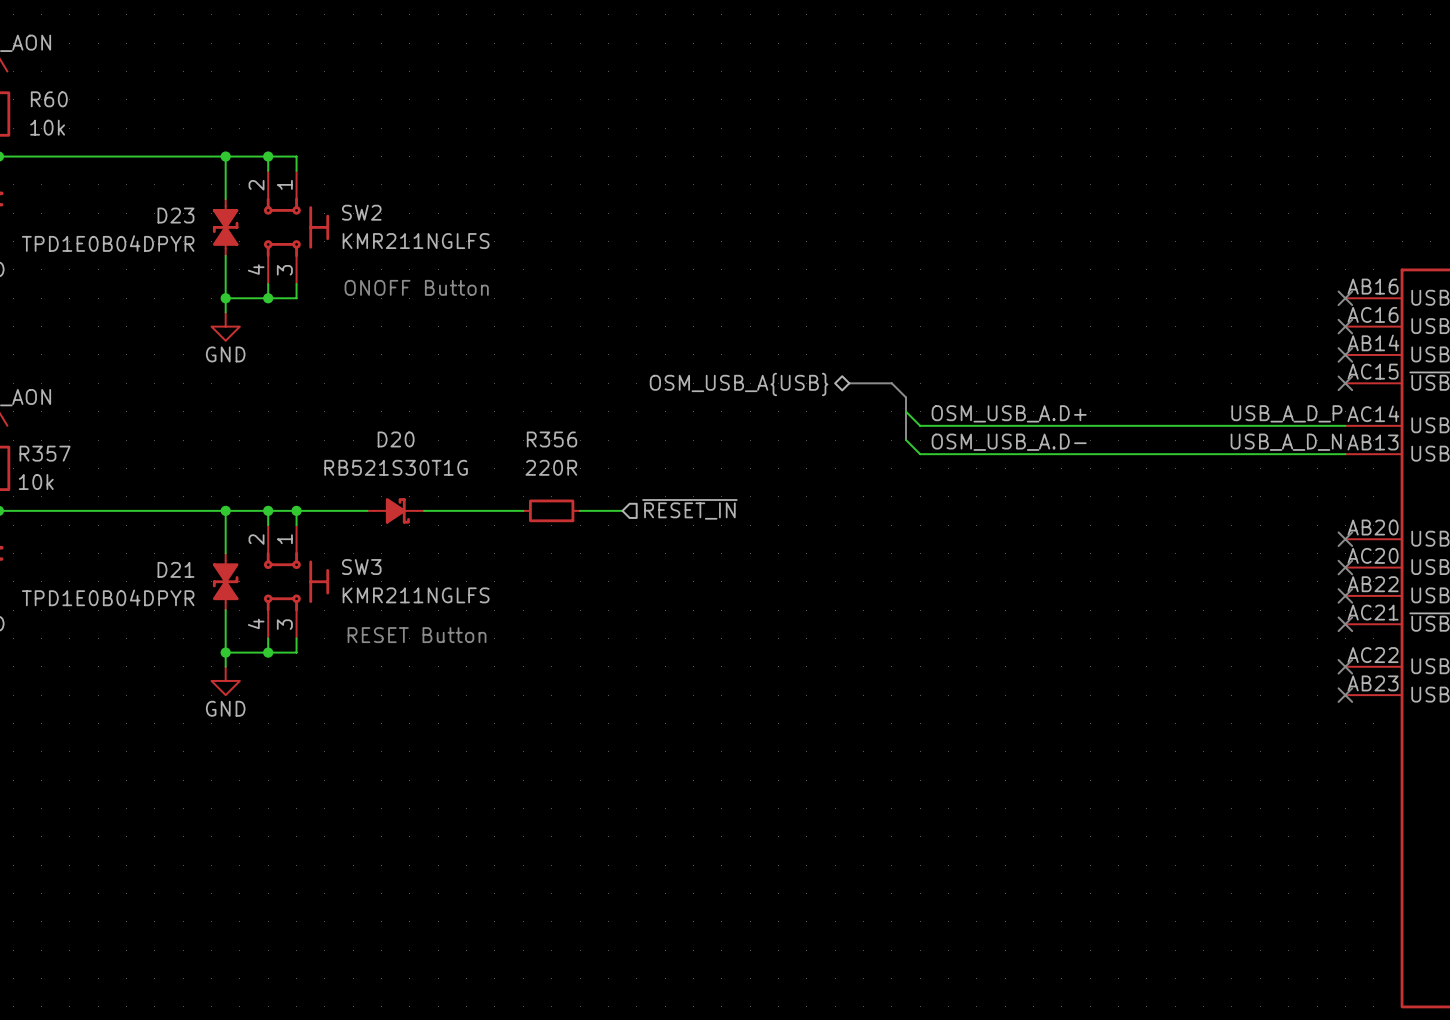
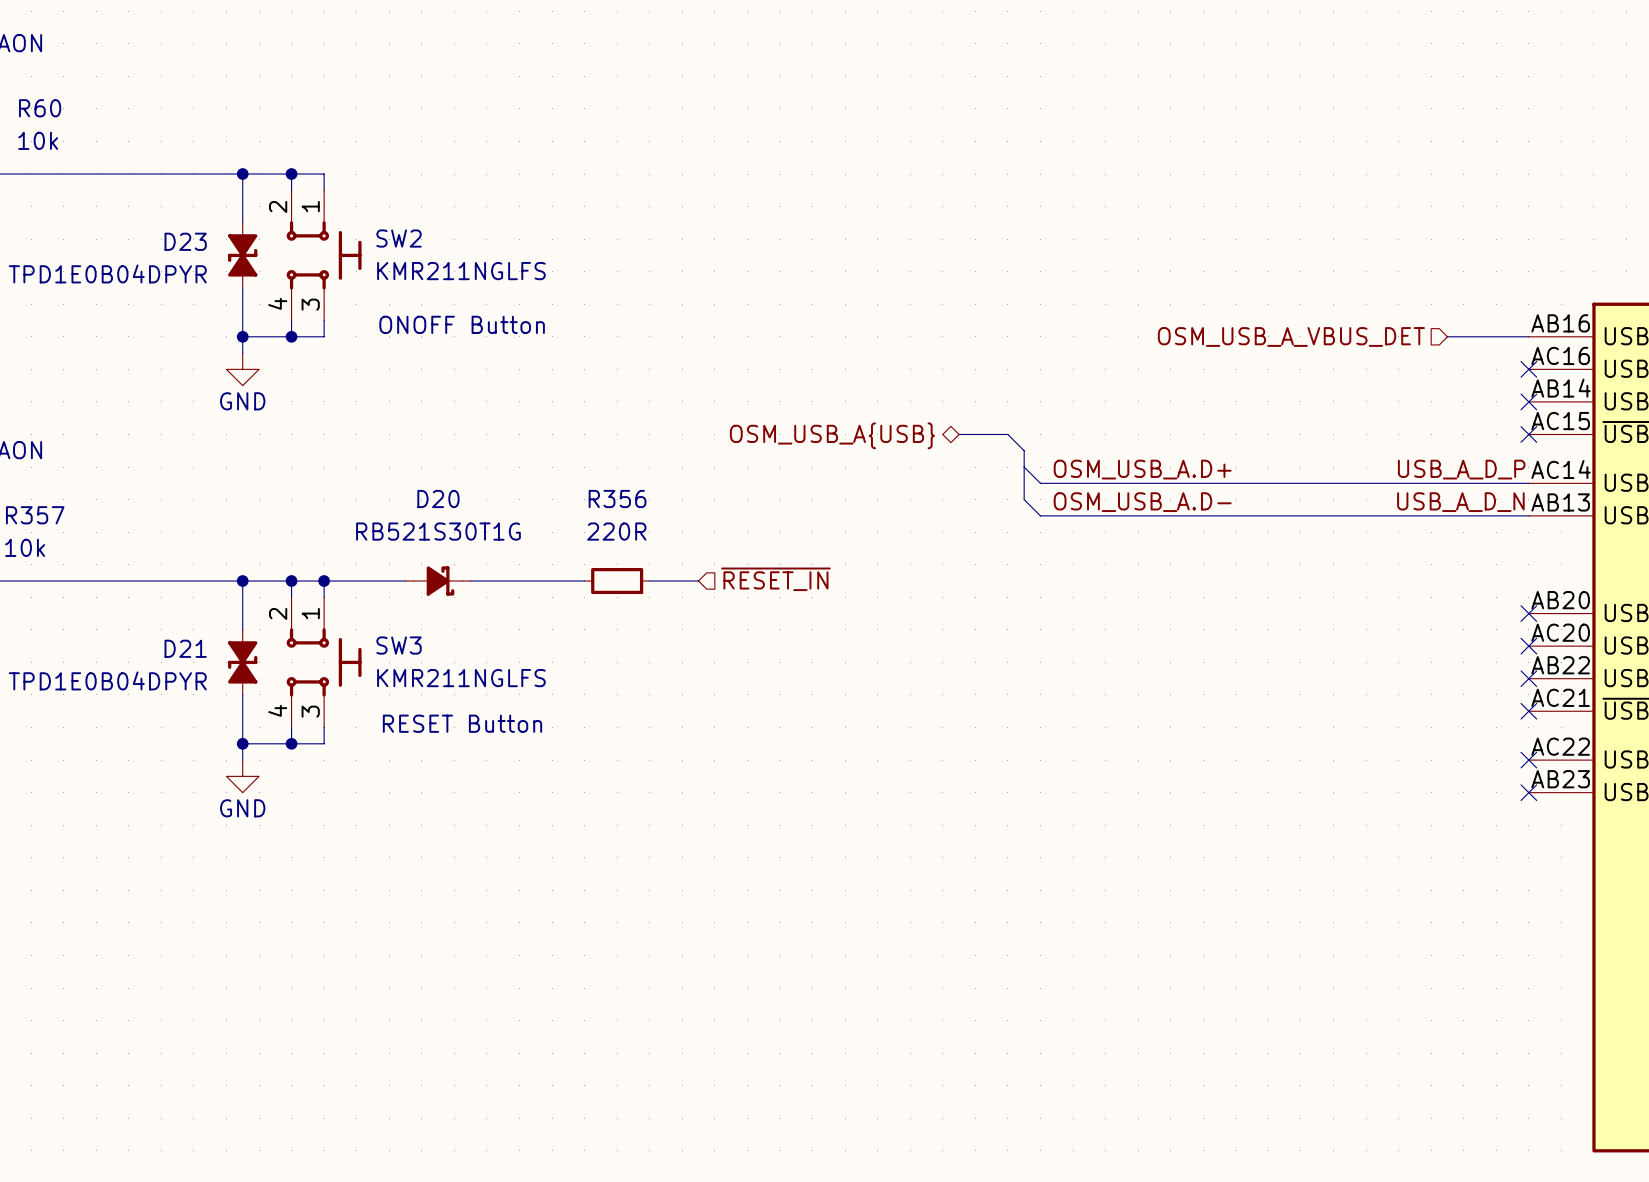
hierarchical label: none -> OSM_USB_A_VBUS_DET (1291, 336)
wire: none -> (1447, 336) (1528, 336)
no-connect mark: (1345, 298) -> none

